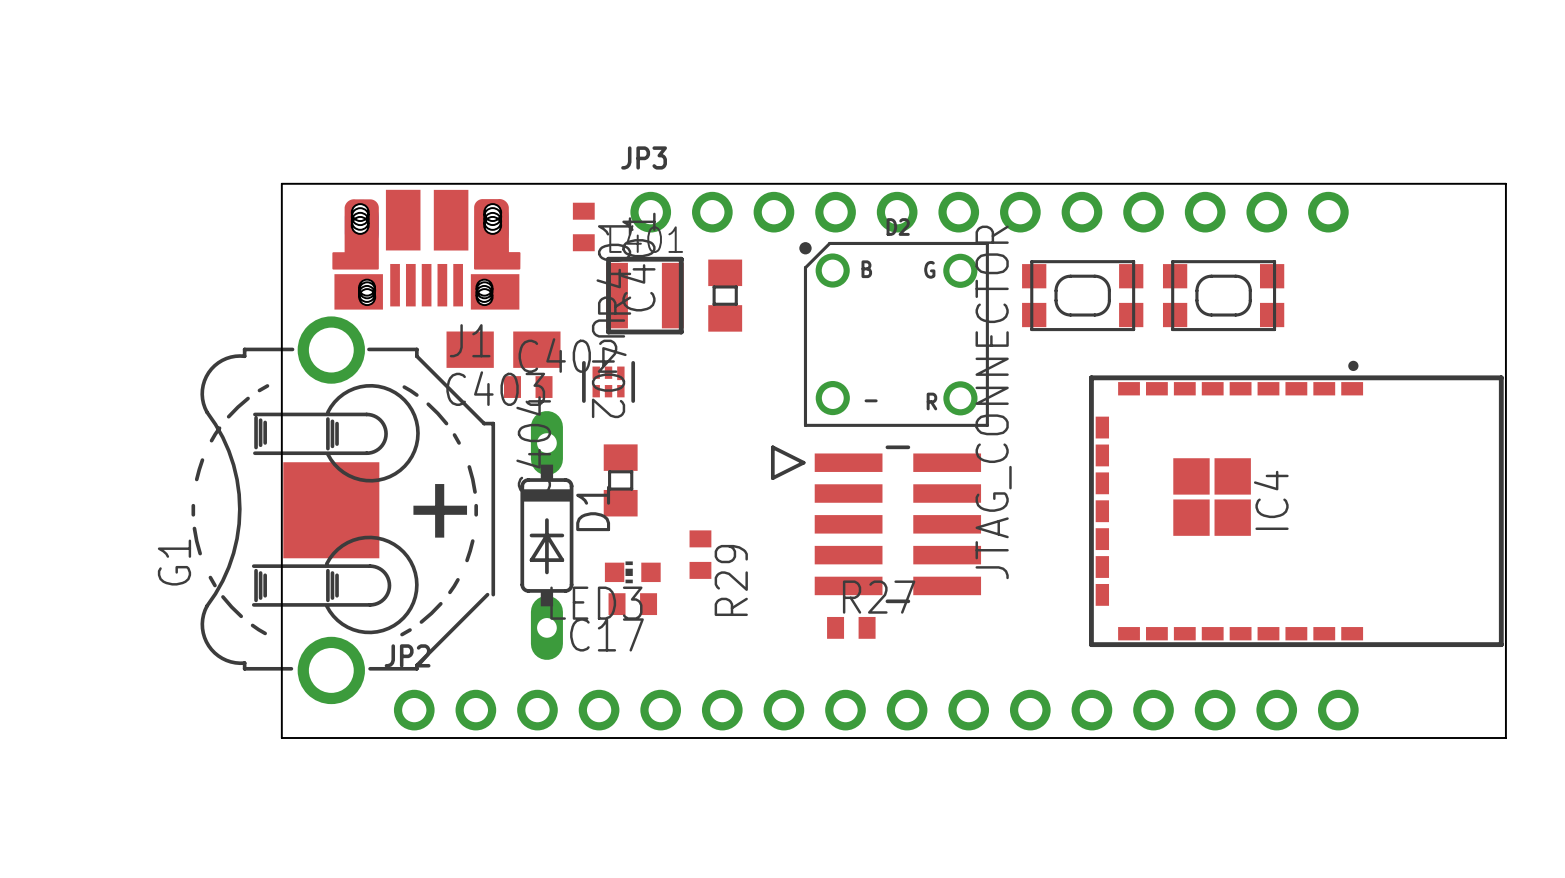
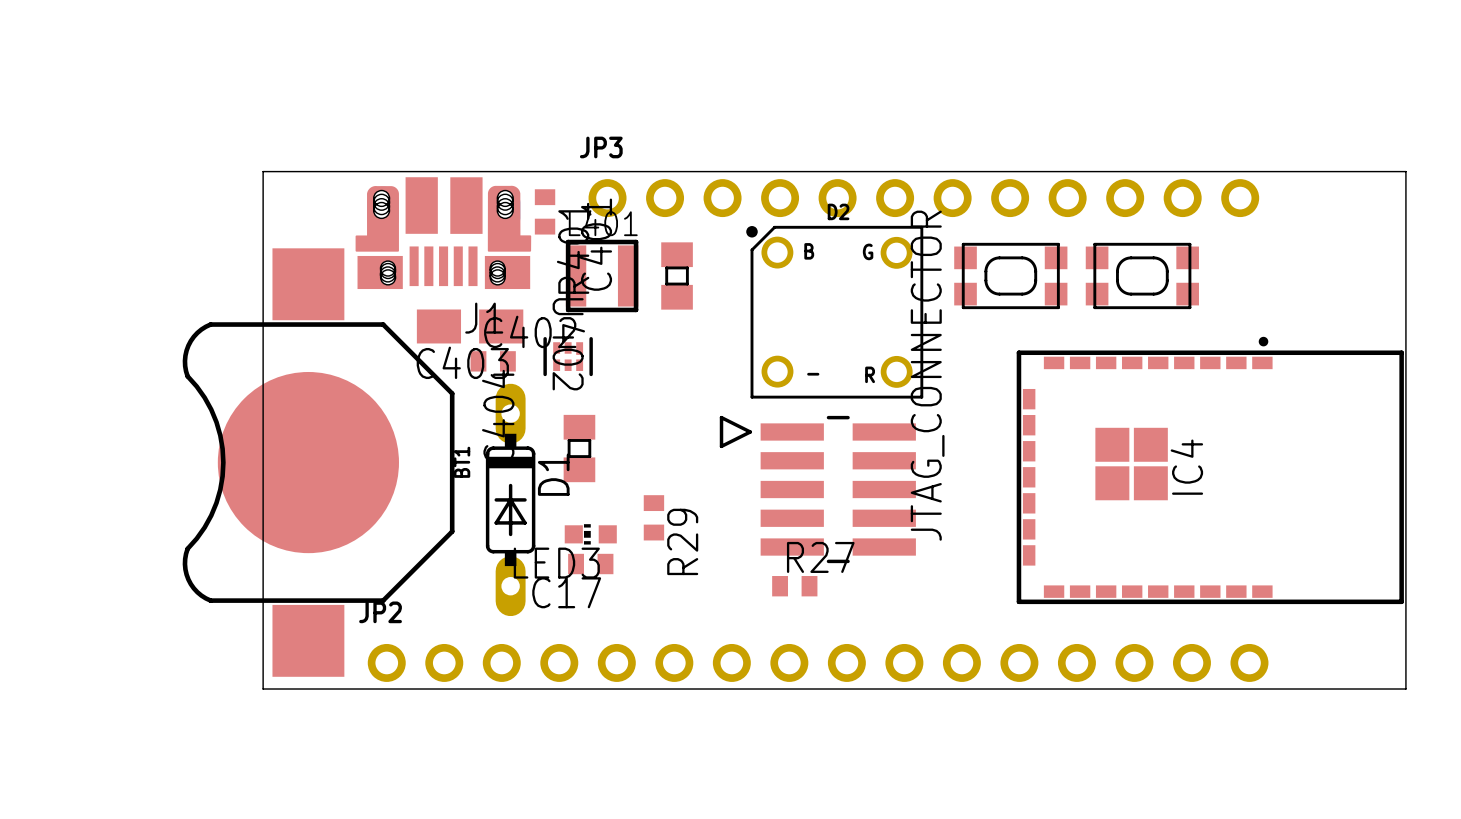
J1 position: (426, 249) -> (443, 233)
BT1: none -> (318, 462)
G1: (343, 510) -> none

